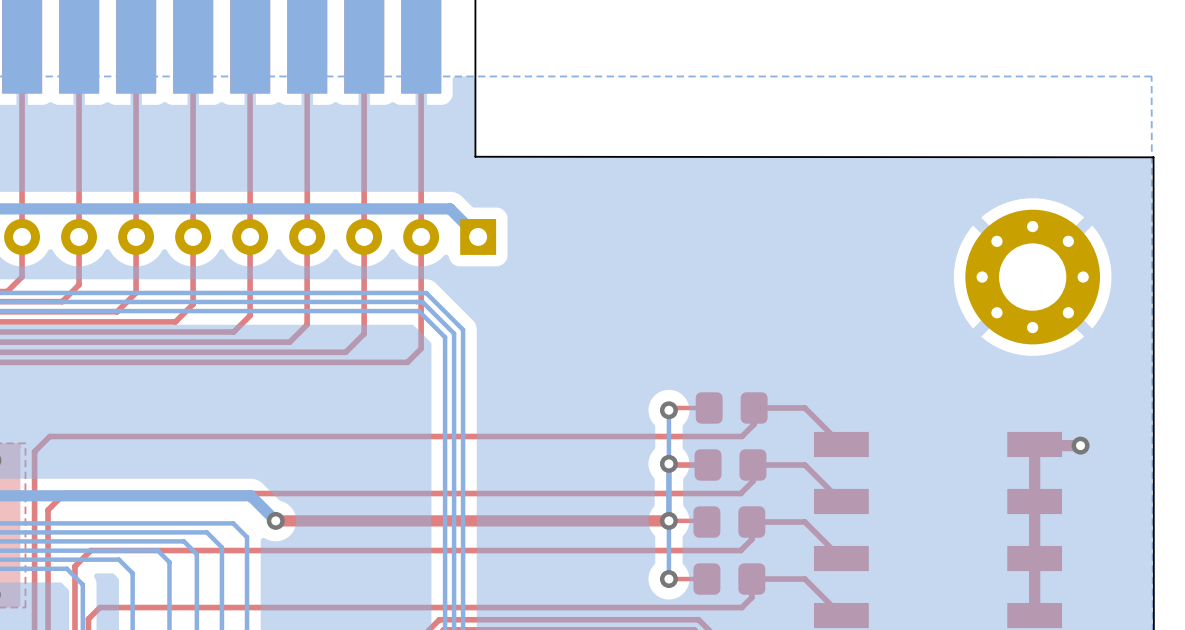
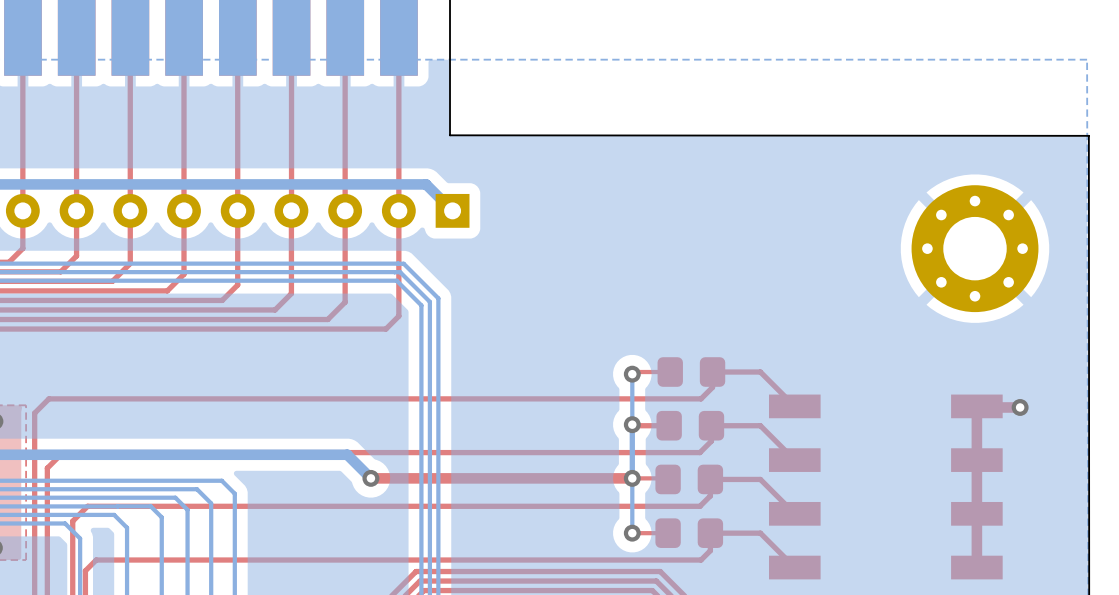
bottom track: (250, 495) (275, 520) -> (238, 454) (347, 454) (370, 478)
via position: (275, 520) -> (370, 478)
top track: (391, 520) (275, 520) -> none

